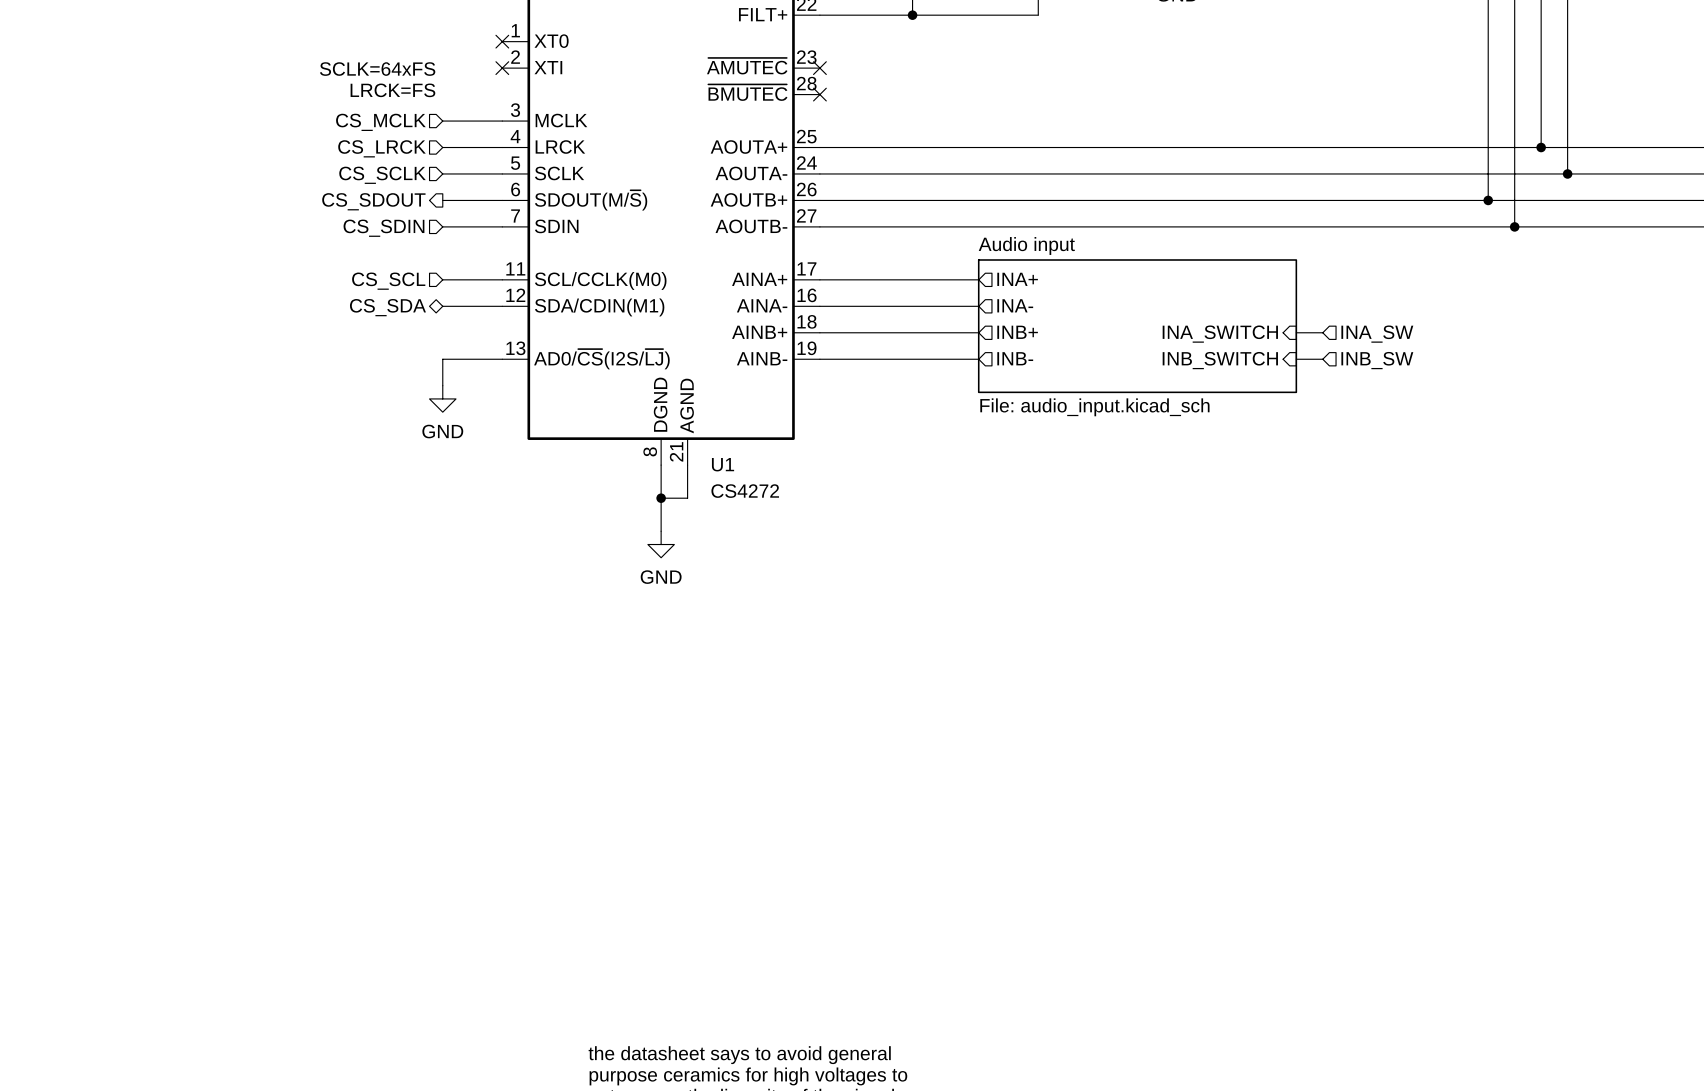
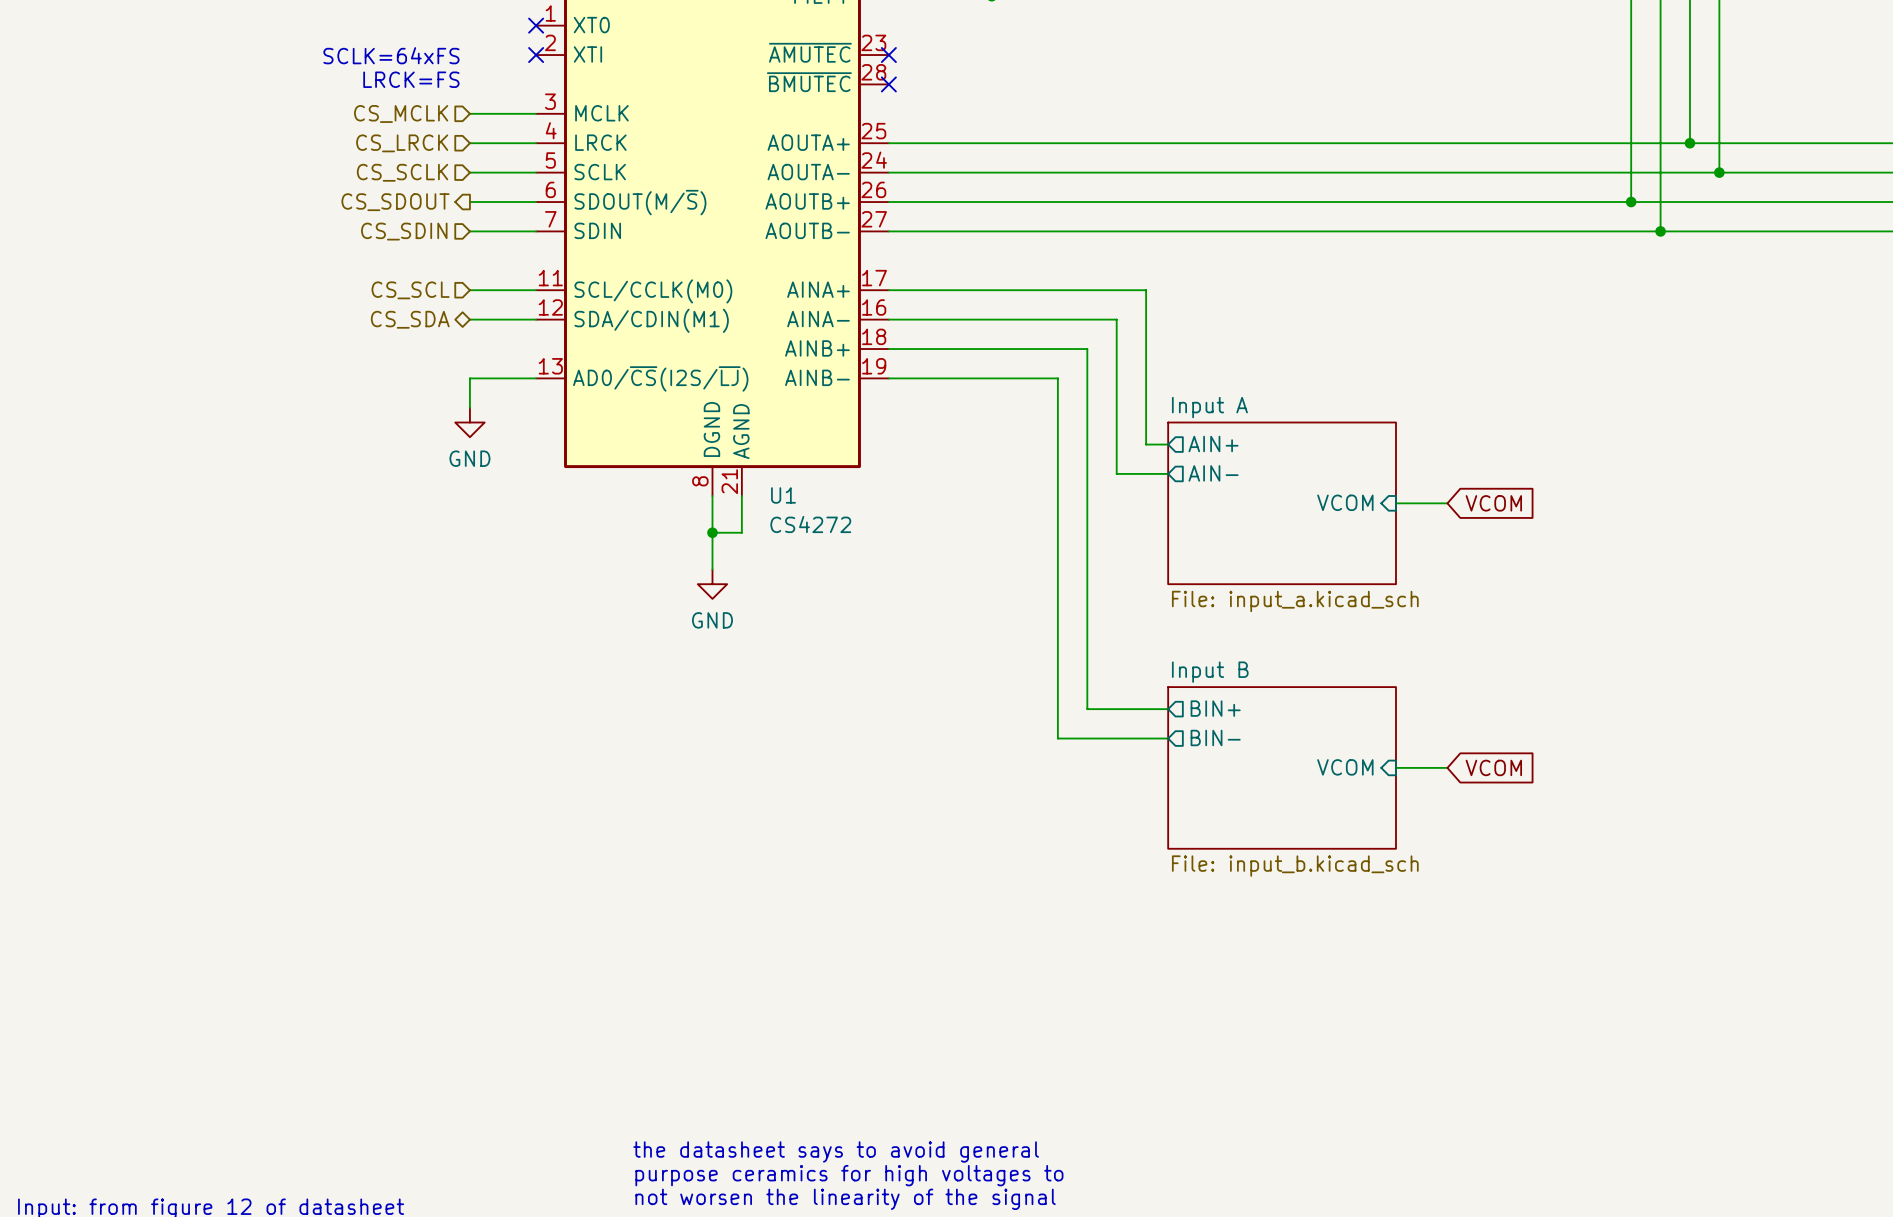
wire: none -> (1065, 290) (1146, 290) (1146, 444) (1168, 444)
sheet pin: INA+ (1017, 279) -> none
sheet pin: INA- (1015, 305) -> none
wire: none -> (1065, 319) (1116, 319) (1116, 473) (1168, 473)
sheet Audio input: File: audio_input.kicad_sch (1137, 326) -> none
wire: none -> (1065, 349) (1087, 349) (1087, 709) (1168, 709)
sheet pin: INB+ (1017, 332) -> none
wire: (1296, 332) (1322, 332) -> none
sheet pin: INA_SWITCH (1220, 334) -> none
hierarchical label: INA_SW (1377, 334) -> none
sheet pin: INB- (1015, 358) -> none
wire: (972, 359) (978, 359) -> (1057, 378) (1057, 738) (1168, 738)
wire: (1296, 359) (1322, 359) -> none
sheet pin: INB_SWITCH (1220, 360) -> none
hierarchical label: INB_SW (1377, 360) -> none
sheet pin: none -> AIN+ (1213, 444)
sheet pin: none -> AIN- (1213, 473)
sheet Input A: none -> File: input_a.kicad_sch (1282, 503)
sheet pin: none -> VCOM (1345, 502)
wire: none -> (1395, 503) (1447, 503)
global label: none -> VCOM (1493, 503)
sheet pin: none -> BIN+ (1215, 708)
sheet pin: none -> BIN- (1215, 737)
sheet Input B: none -> File: input_b.kicad_sch (1282, 767)
sheet pin: none -> VCOM (1345, 767)
wire: none -> (1395, 767) (1447, 767)
global label: none -> VCOM (1493, 767)

